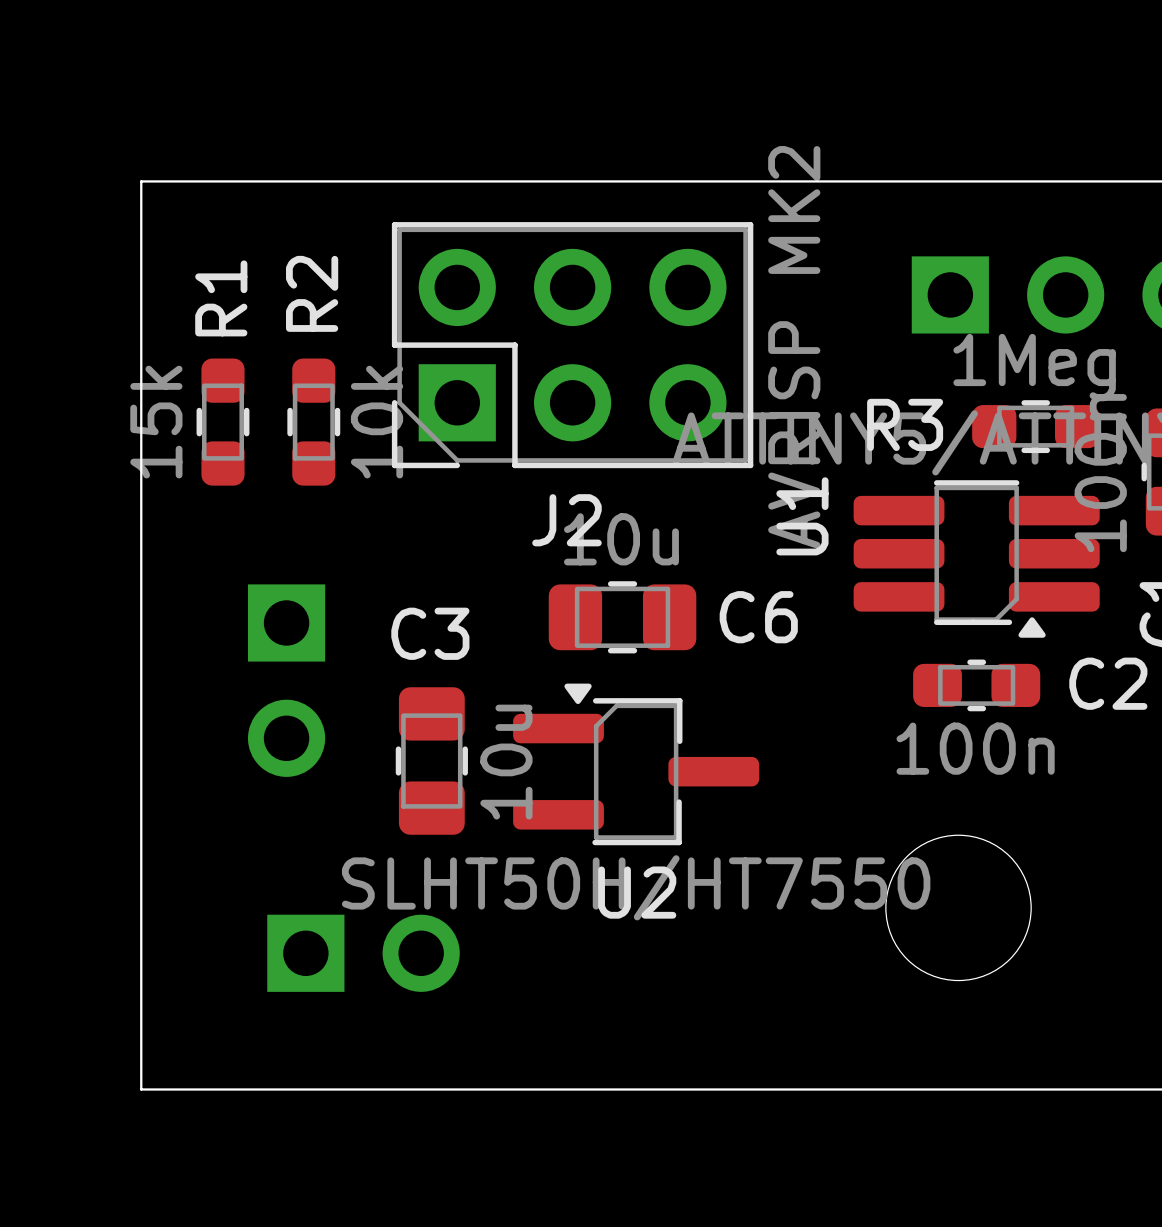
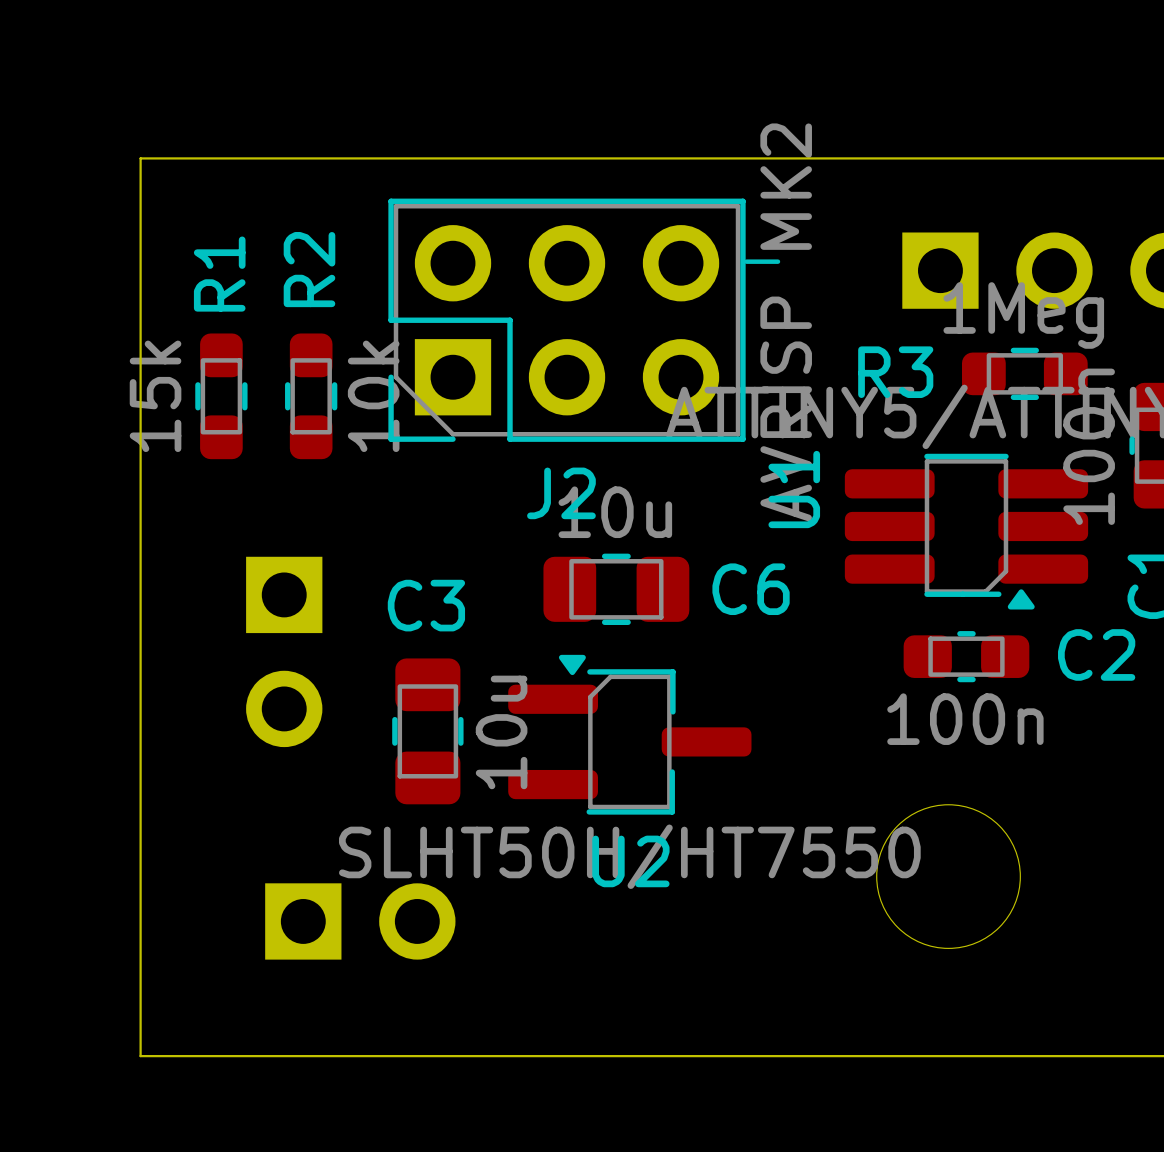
line: none -> (746, 261) (777, 261)
R3 position: (1035, 426) -> (1024, 373)

